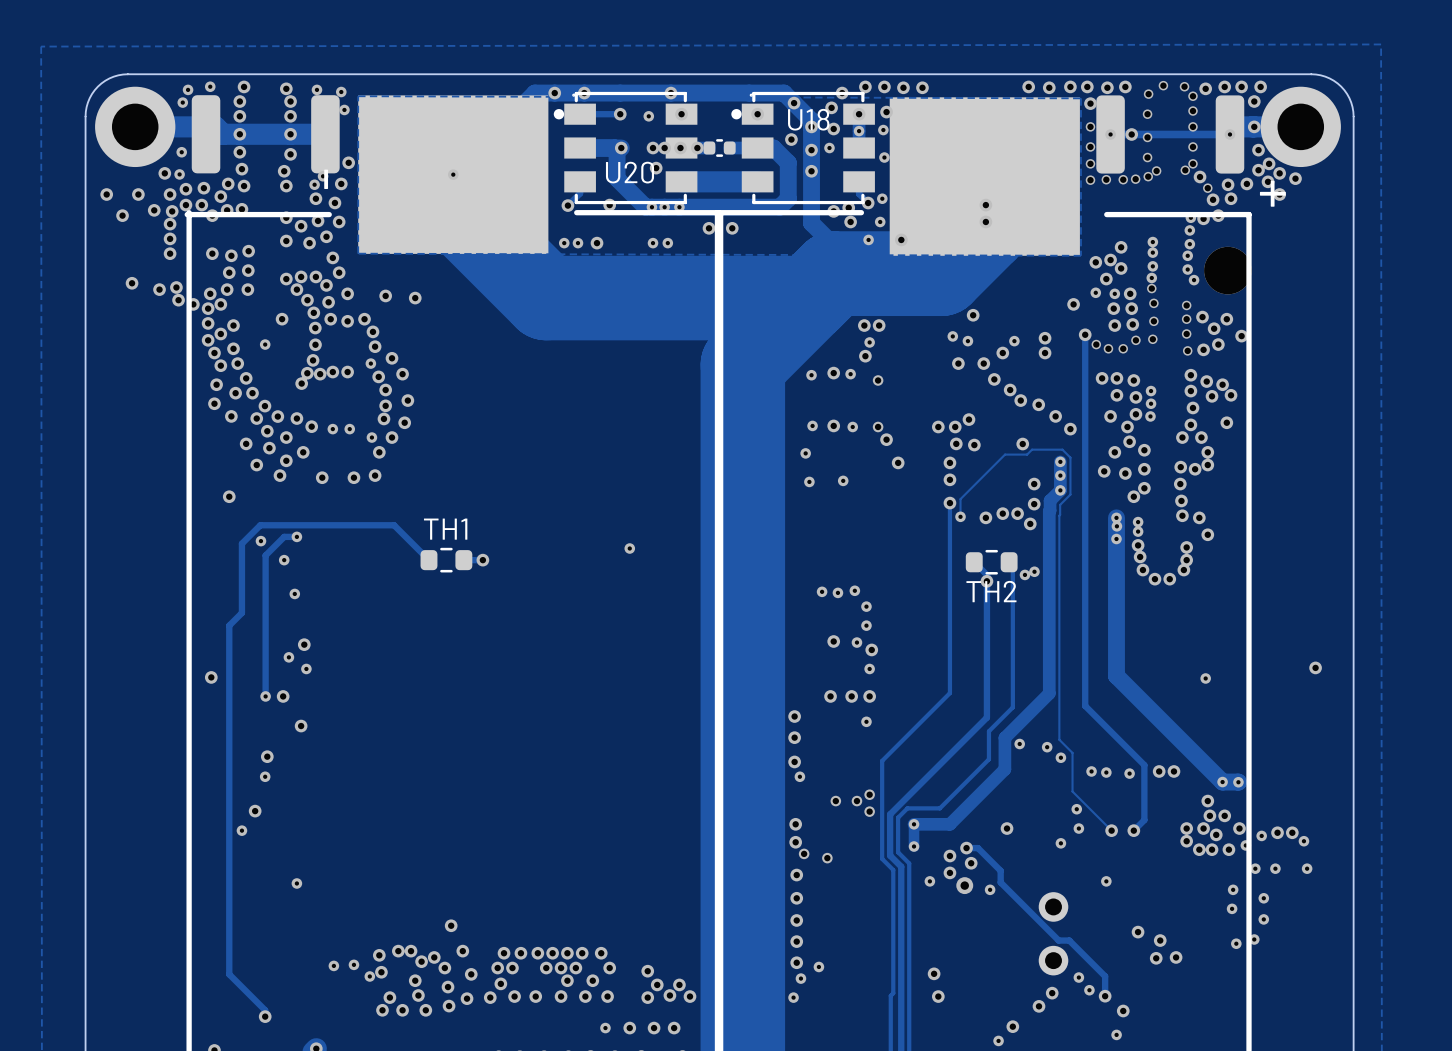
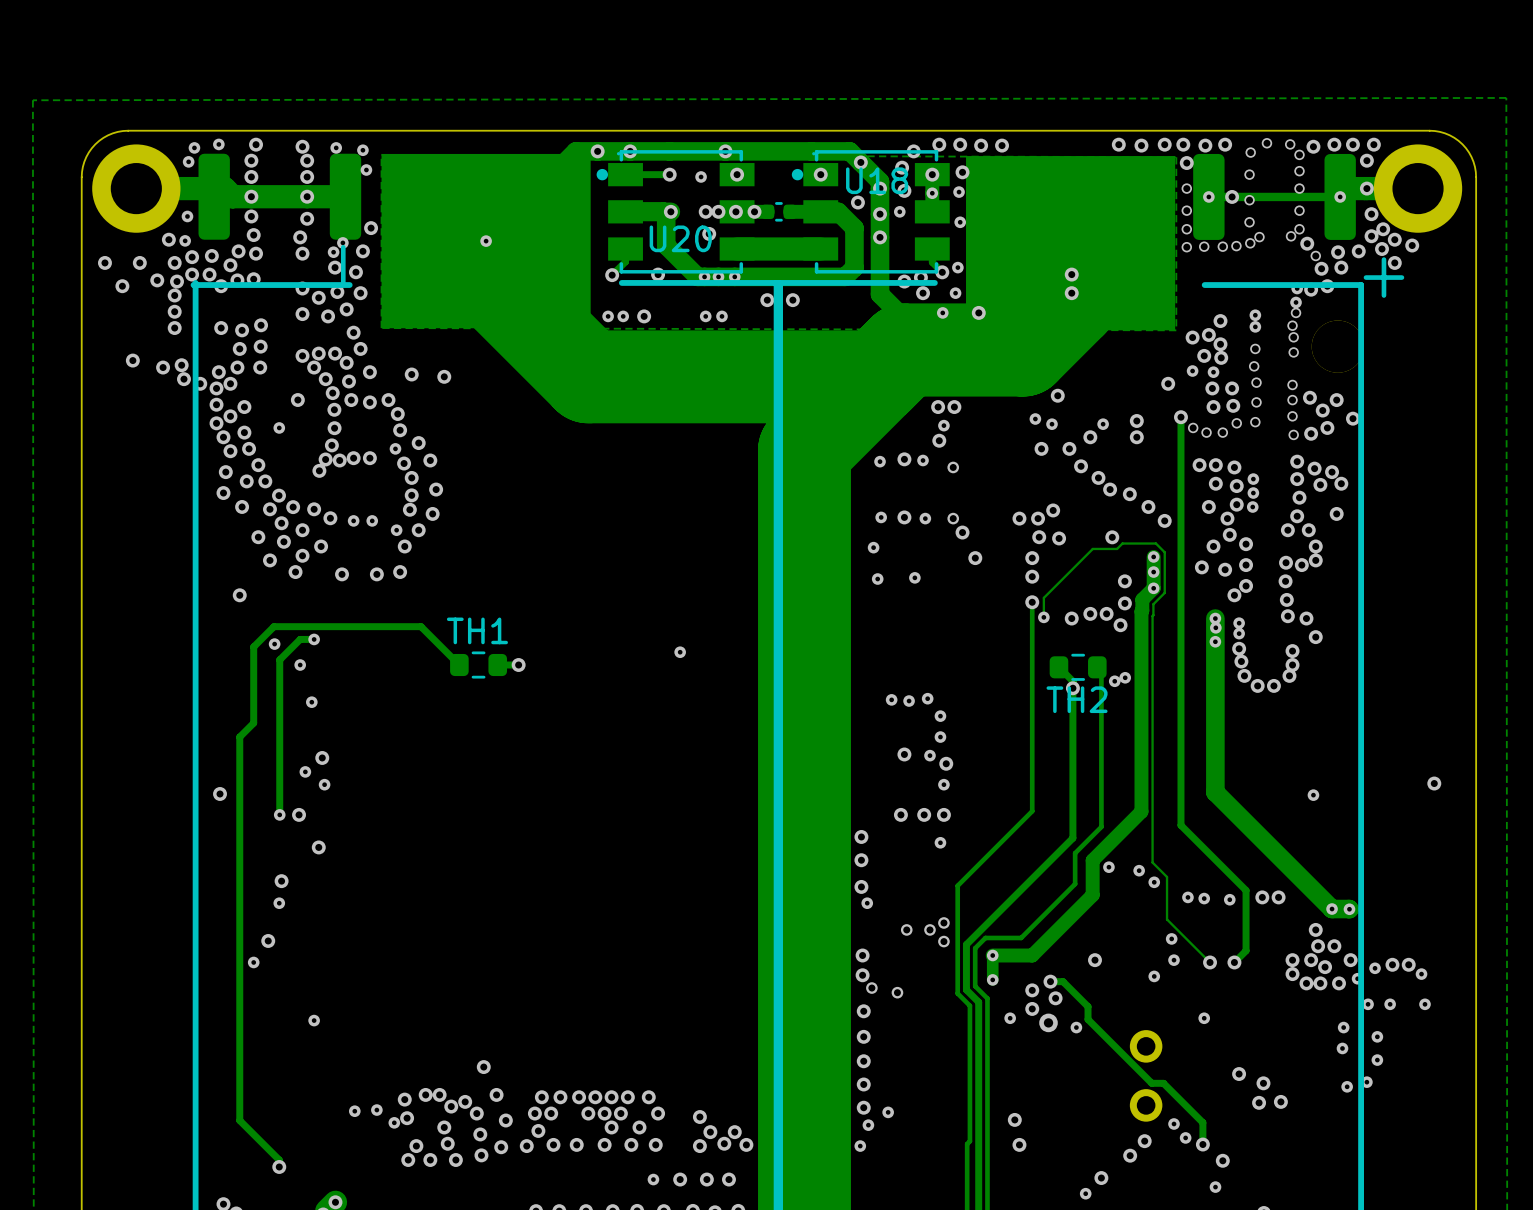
via: none -> (1296, 312)
via: (1189, 244) -> none
via: none -> (1292, 325)
via: (1187, 255) -> none
via: none -> (1293, 337)
via: (1152, 266) -> none
via: (1187, 269) -> none
via: none -> (1255, 348)
via: none -> (1293, 352)
via: (1151, 277) -> none
via: (1194, 280) -> none
via position: (1130, 293) -> (1221, 357)

